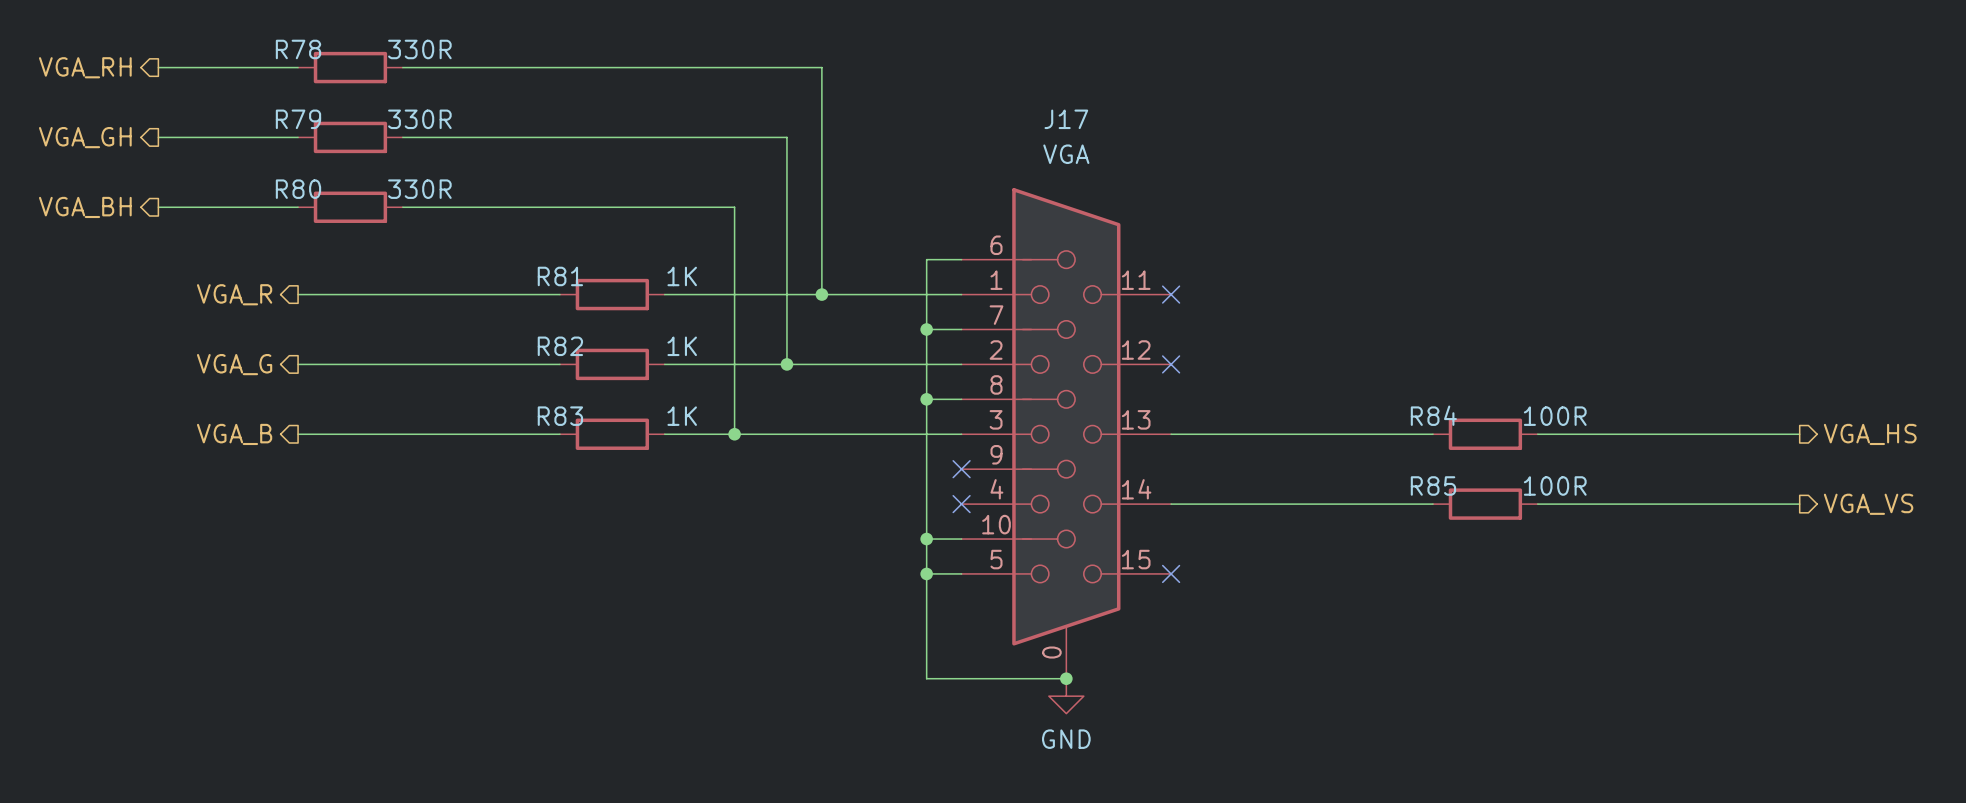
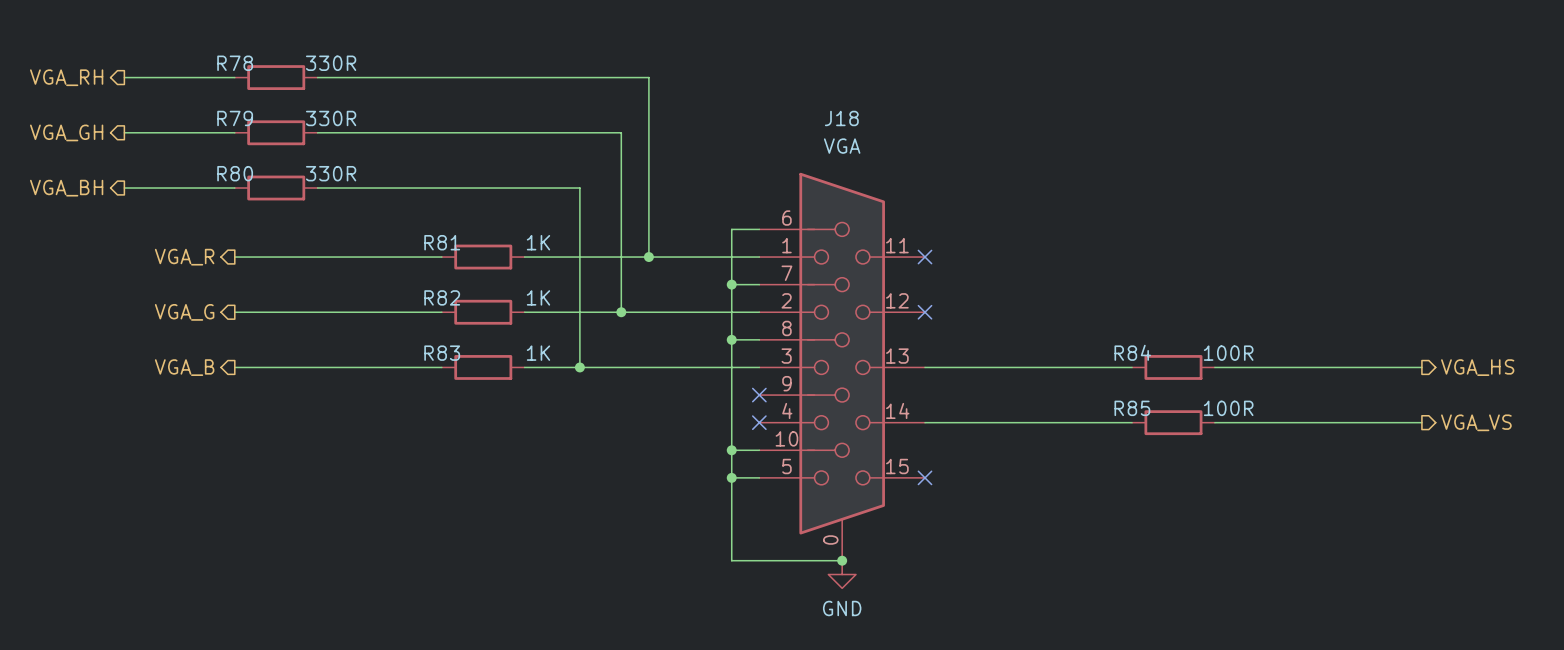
J17 name: J17 (1066, 119) -> J18 (841, 118)

